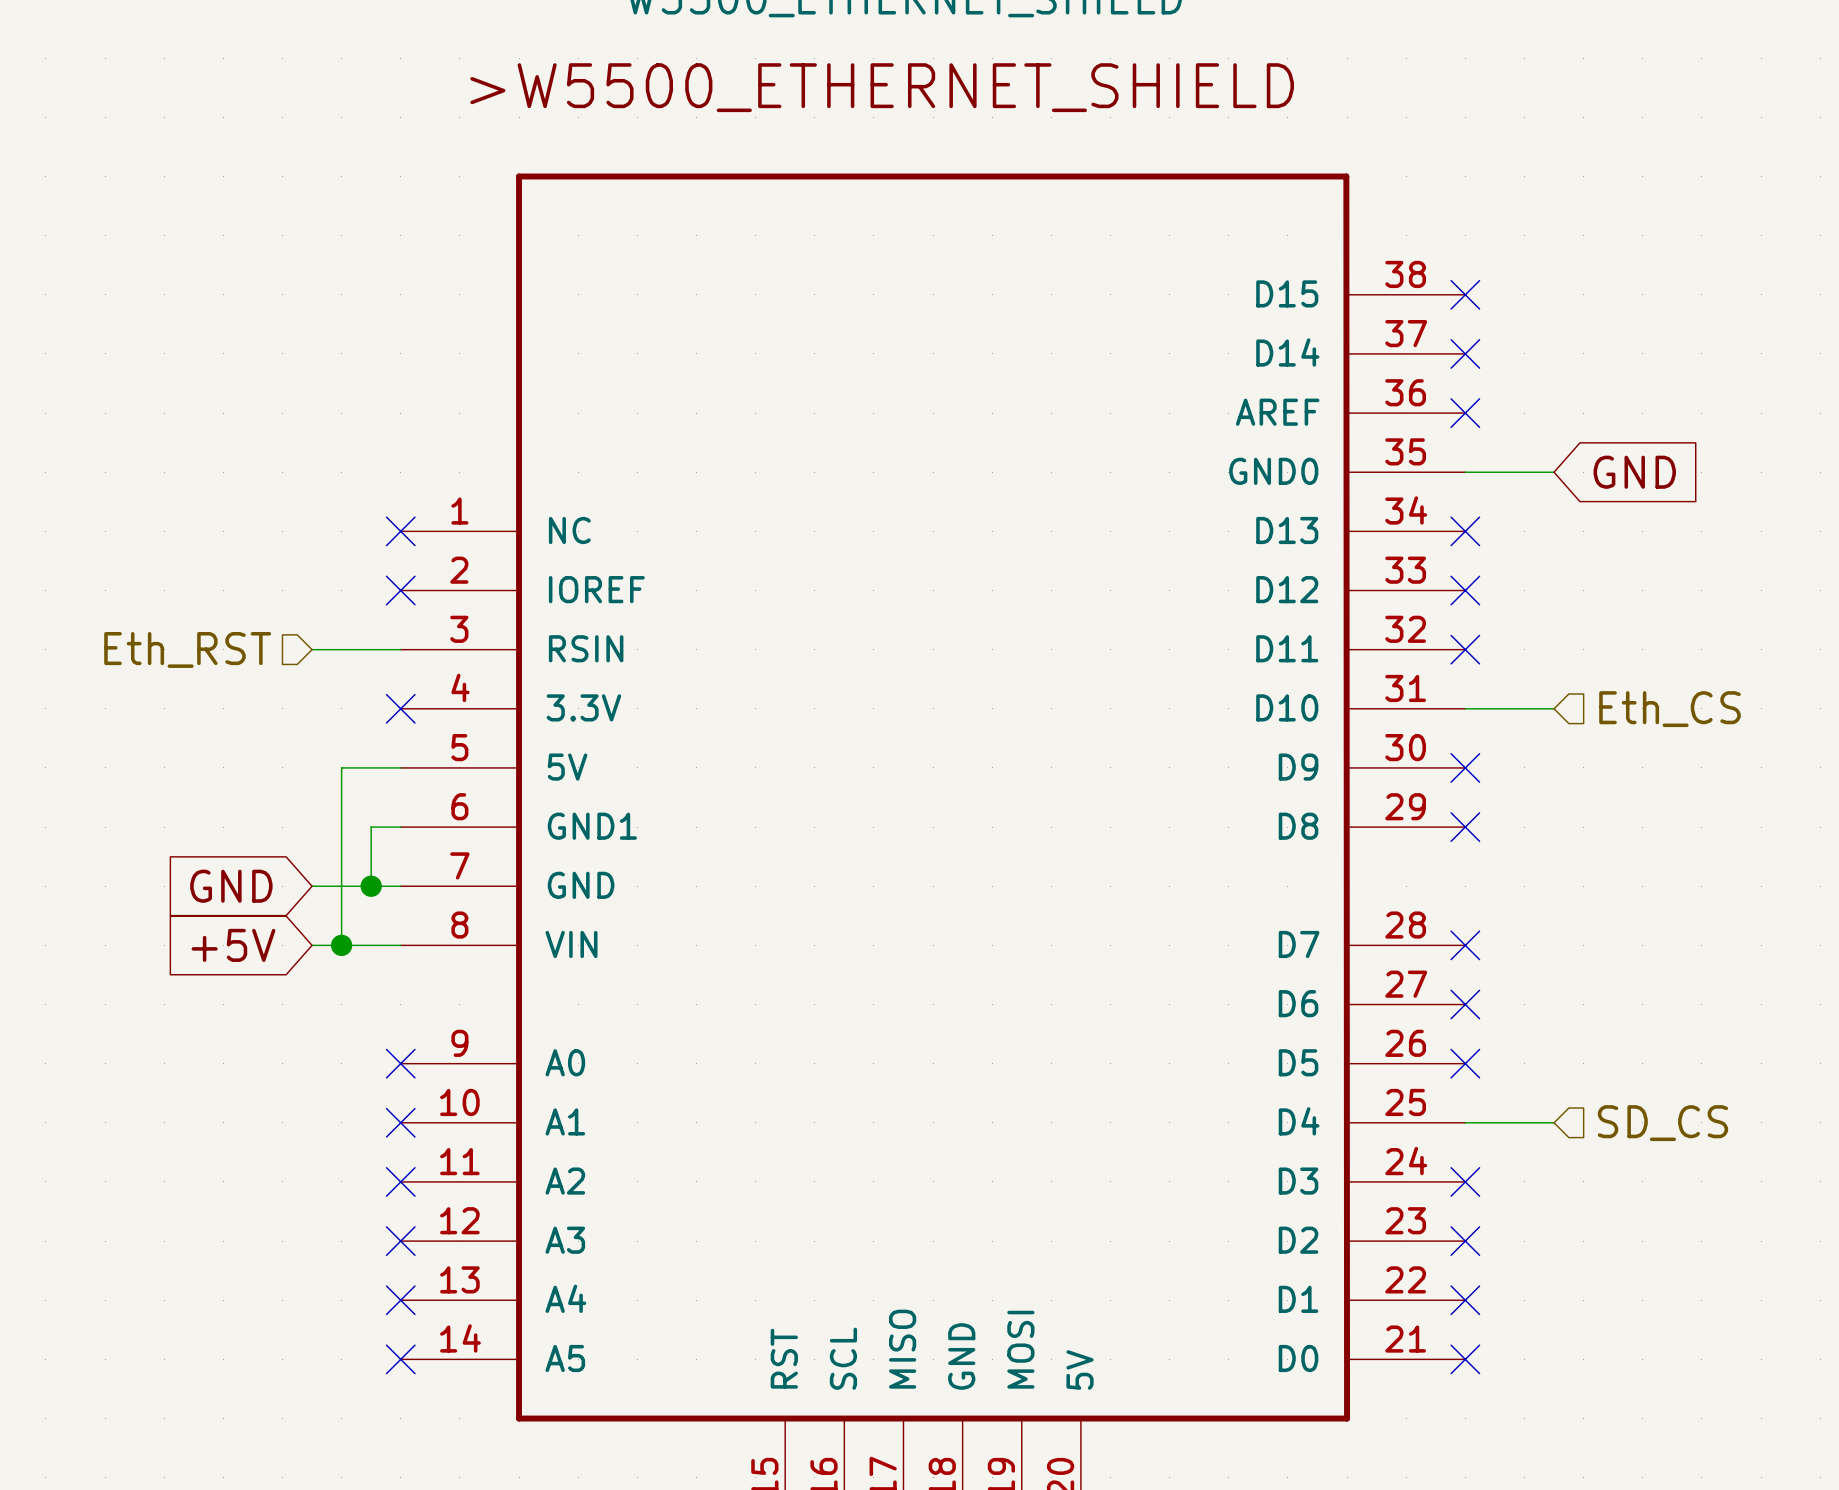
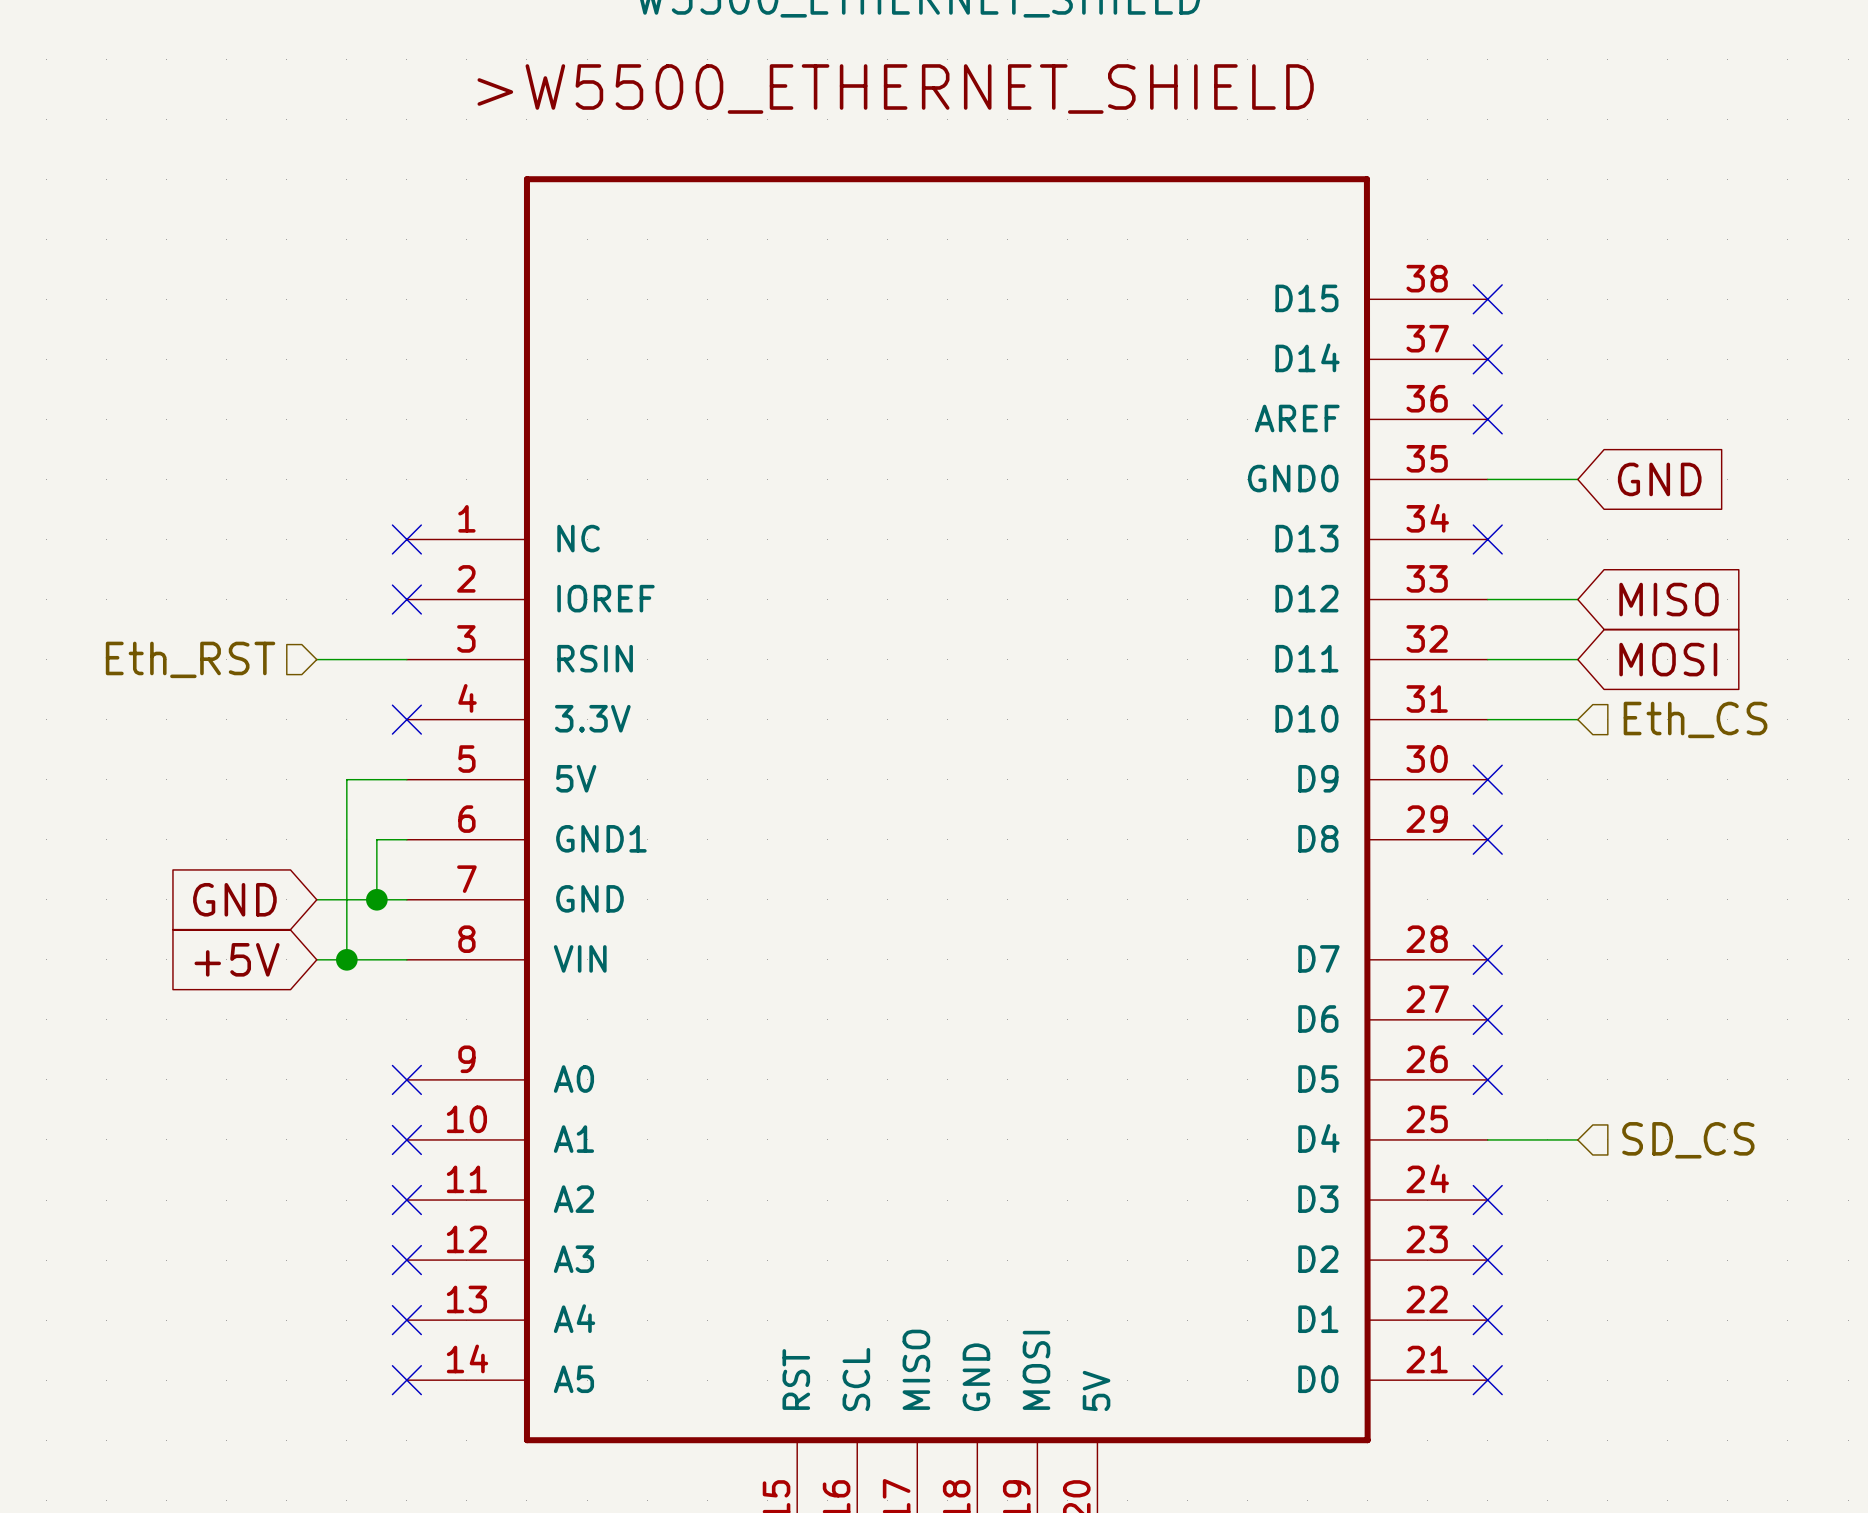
wire: none -> (1487, 599) (1577, 599)
no-connect mark: (1465, 590) -> none
global label: none -> MISO (1669, 599)
wire: none -> (1487, 659) (1577, 659)
no-connect mark: (1465, 649) -> none
global label: none -> MOSI (1668, 659)

